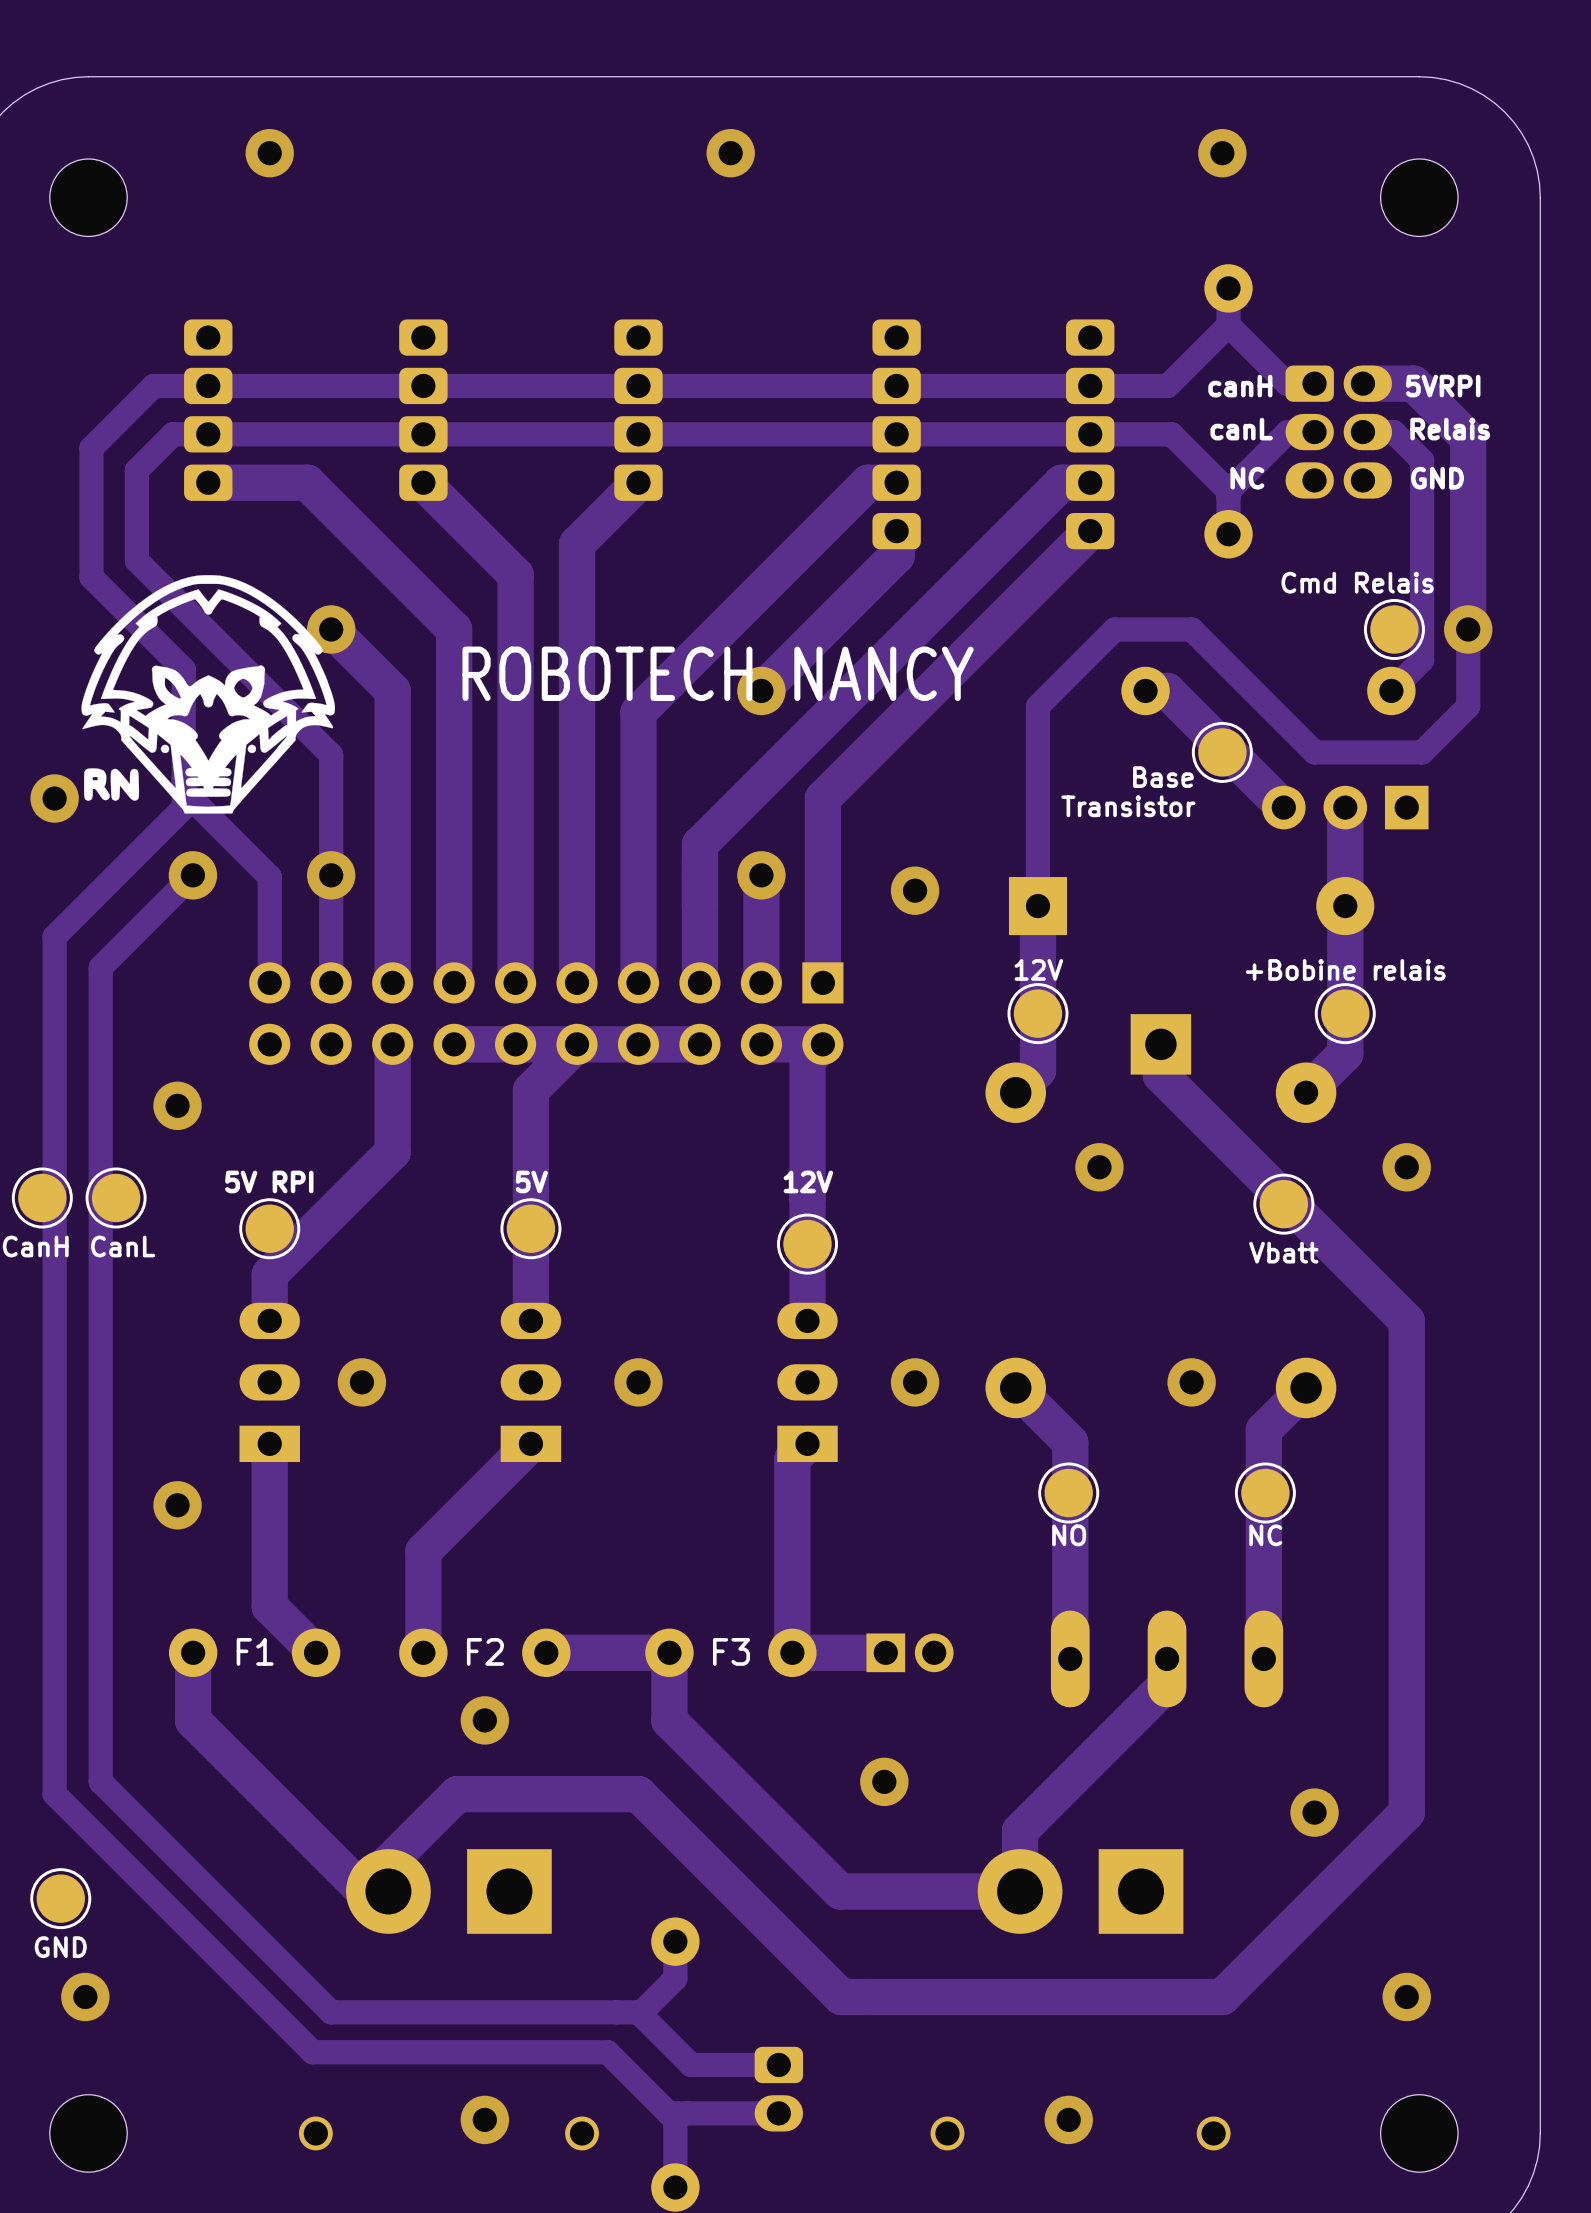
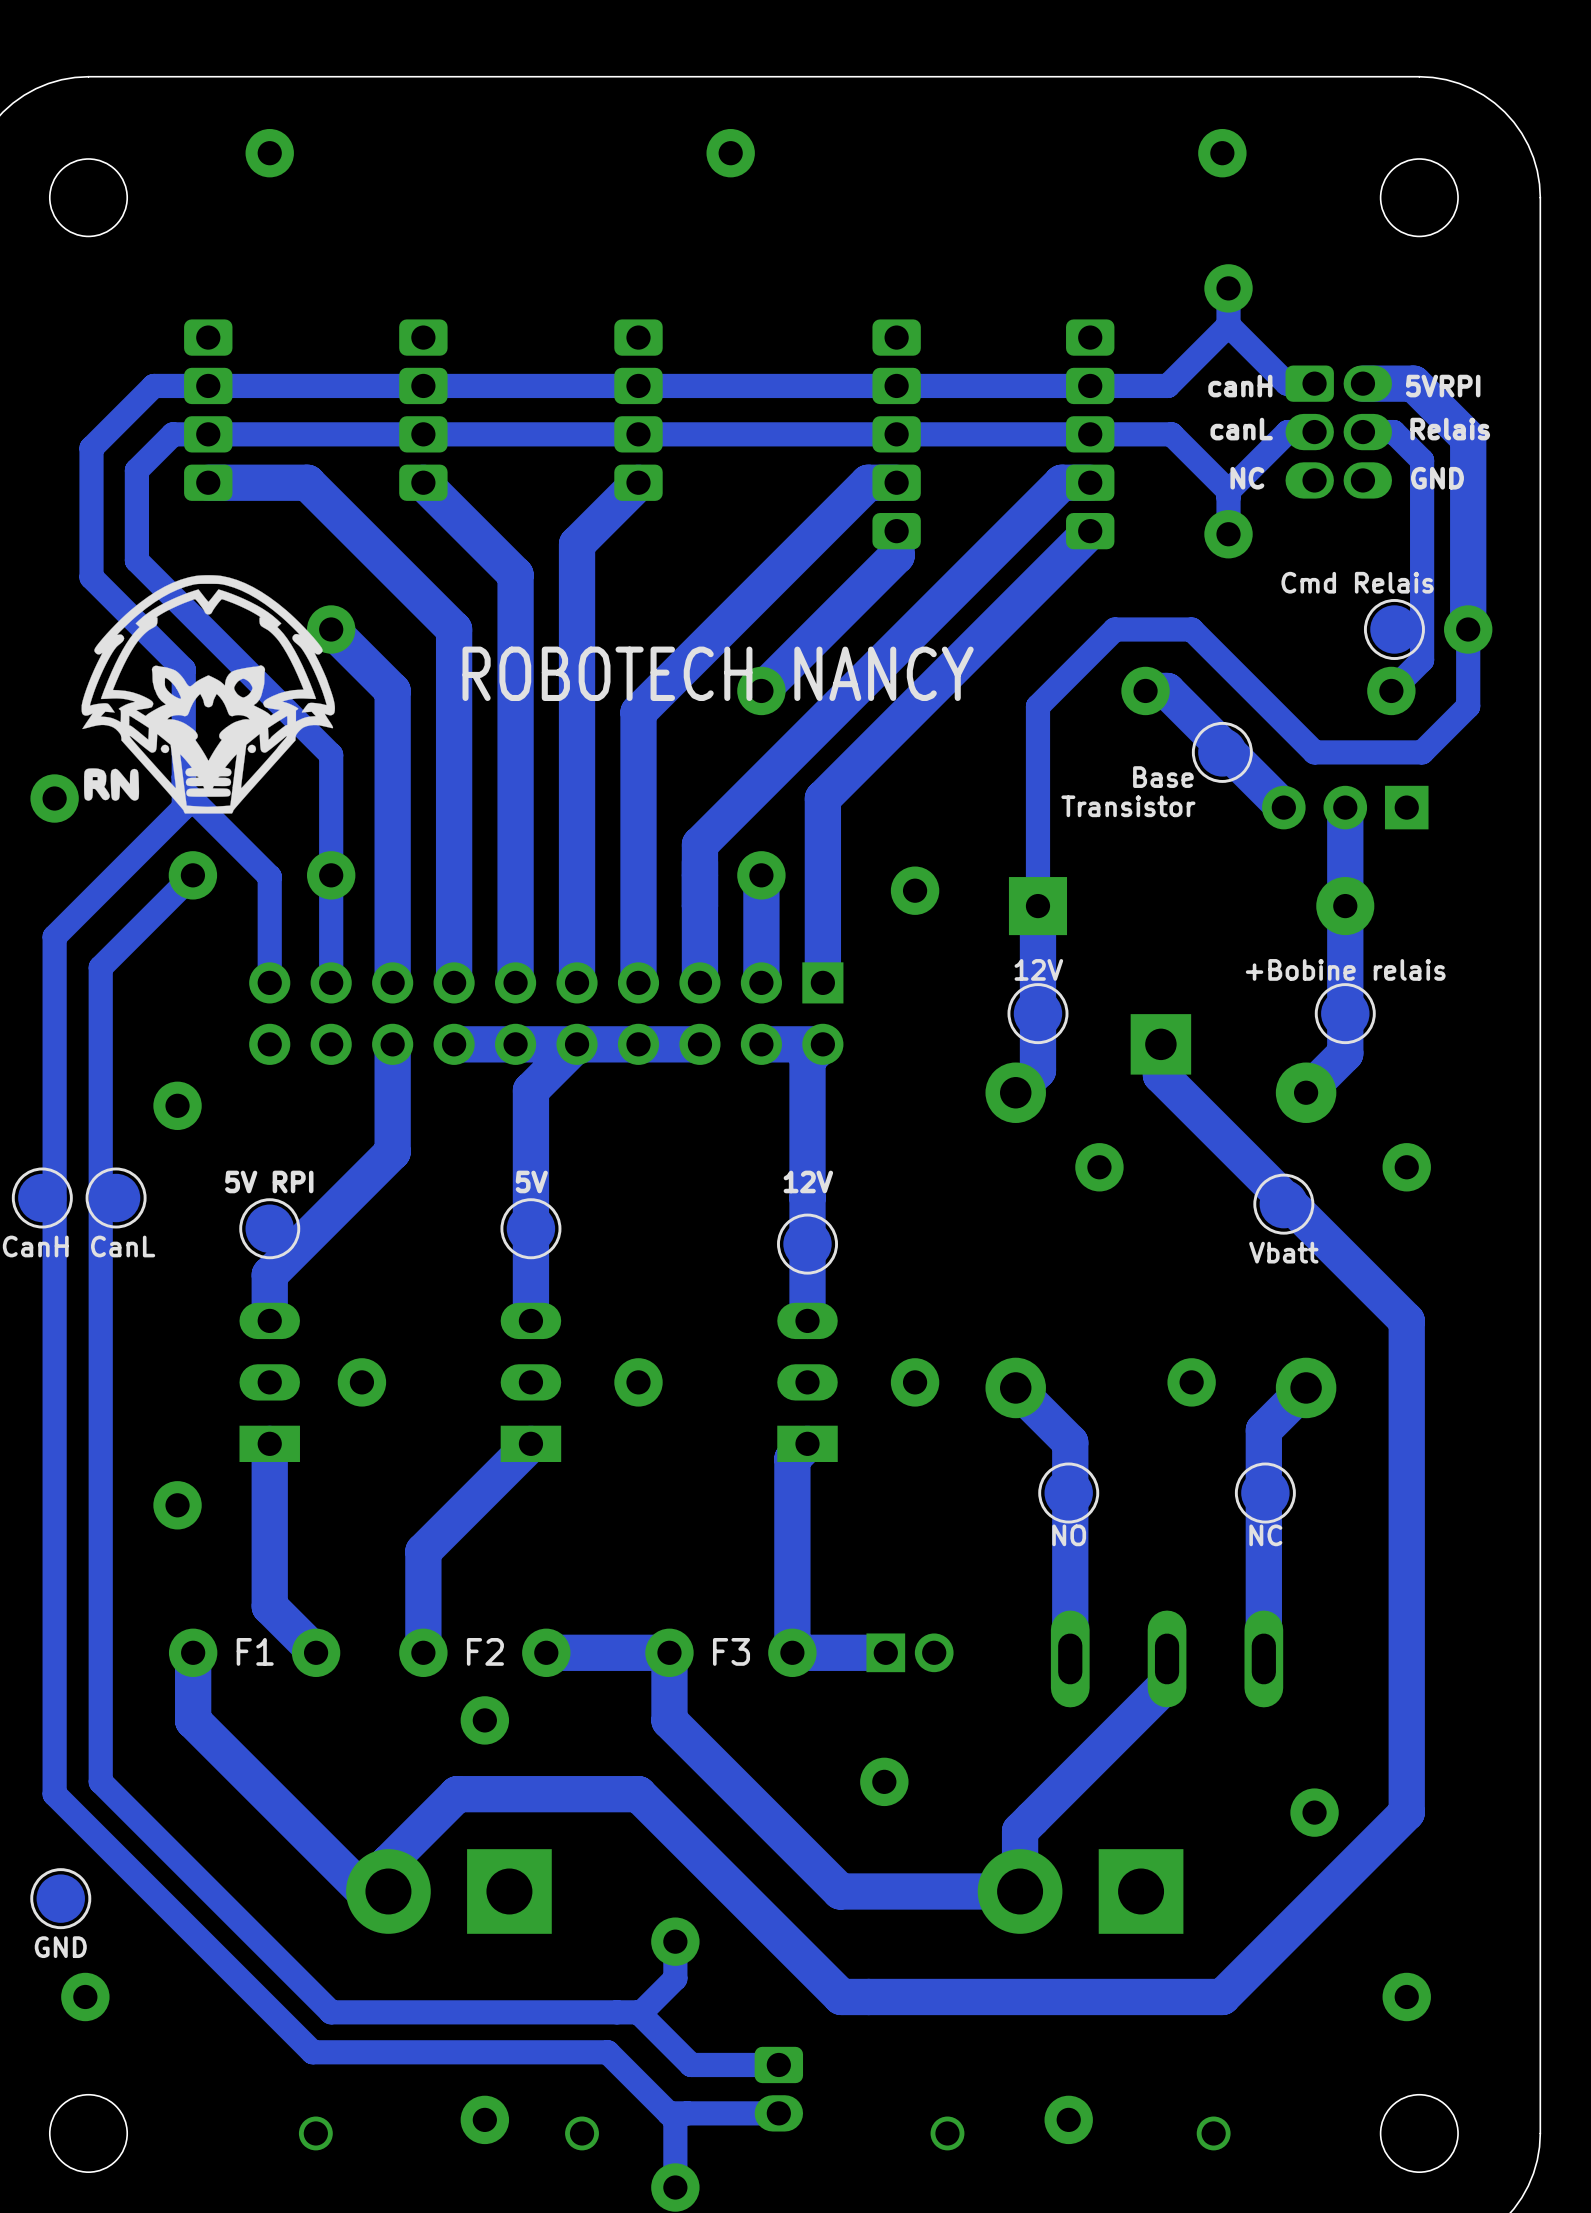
part footprint: [1050, 1610, 1284, 1708] -> [1050, 1610, 1284, 1708]

